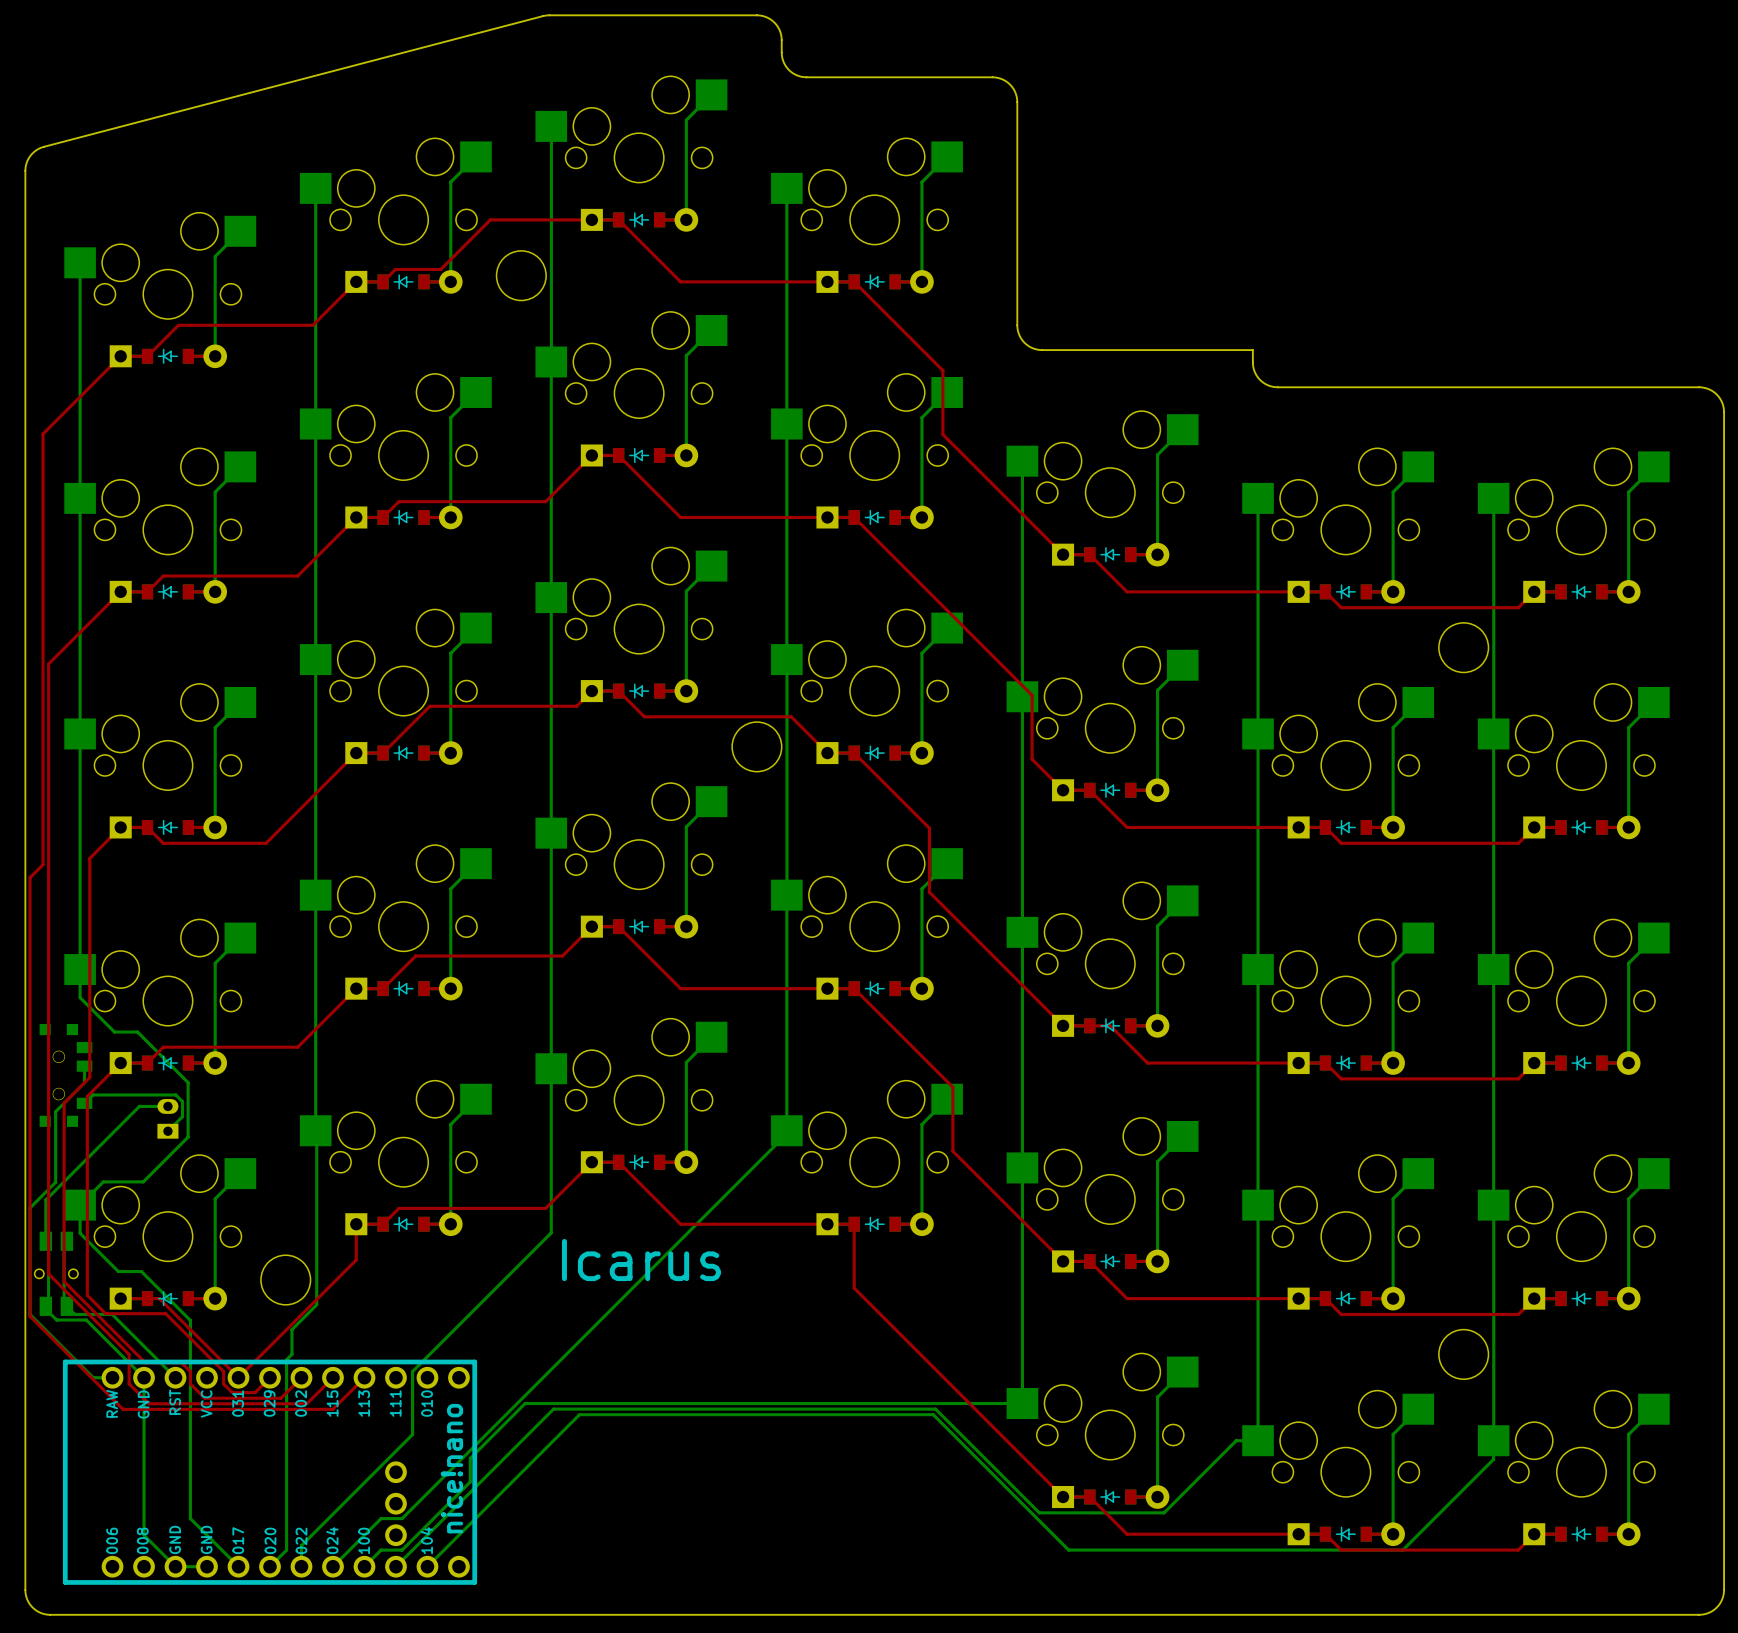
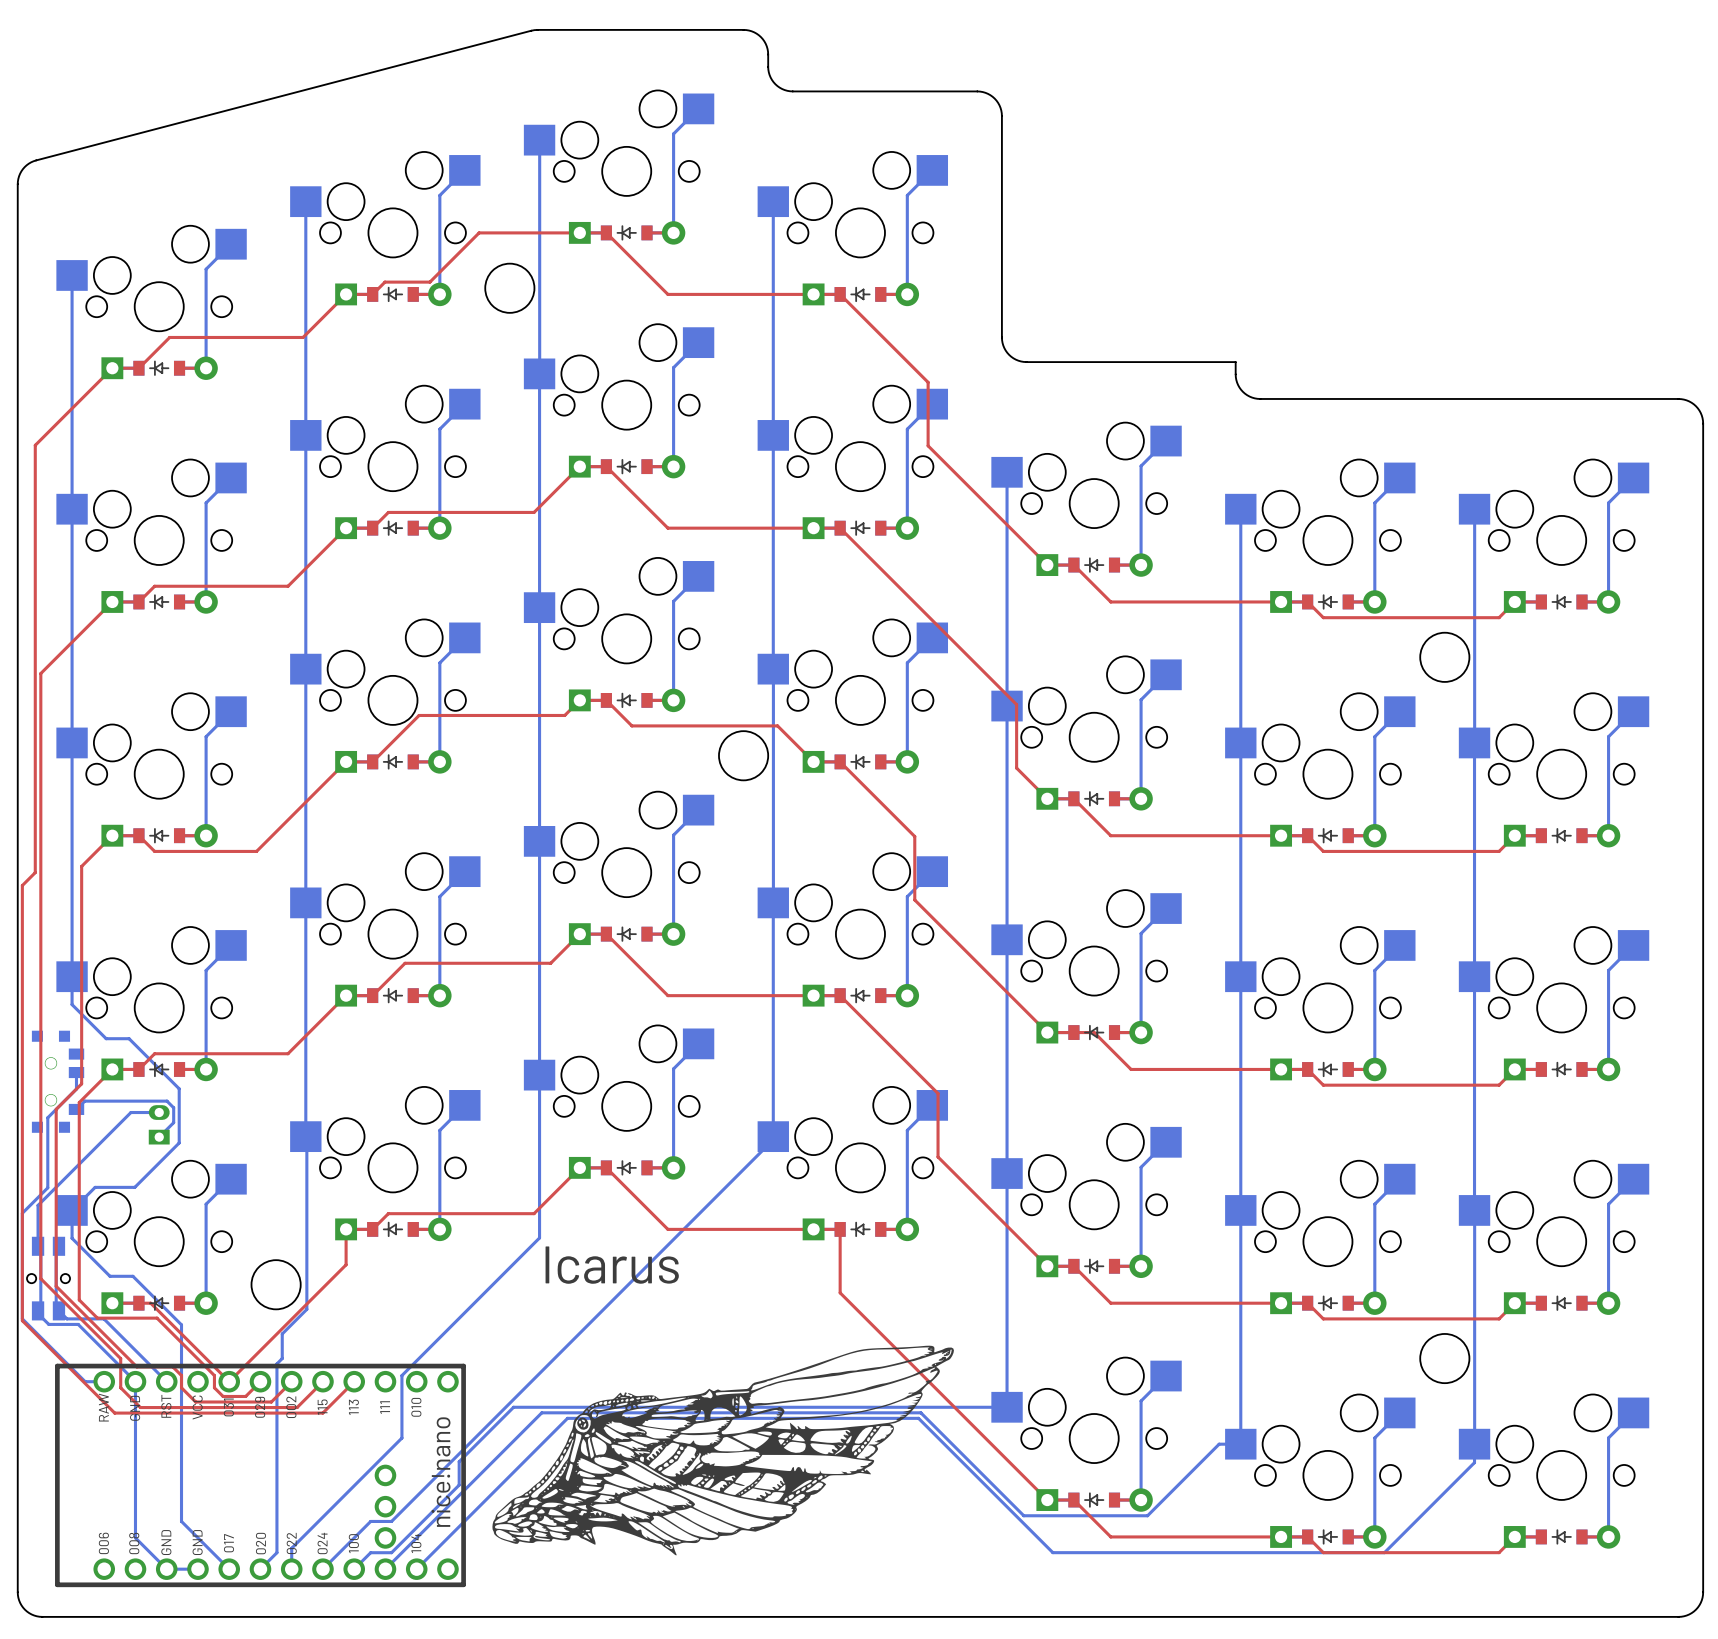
drawing: none -> [492, 1345, 954, 1556]

